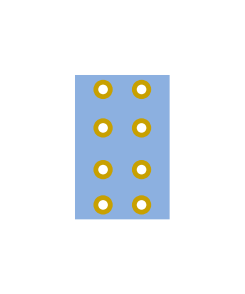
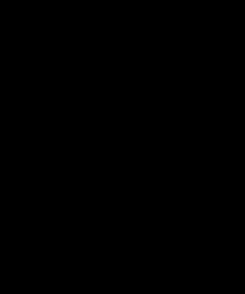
part: (122, 147) -> none

